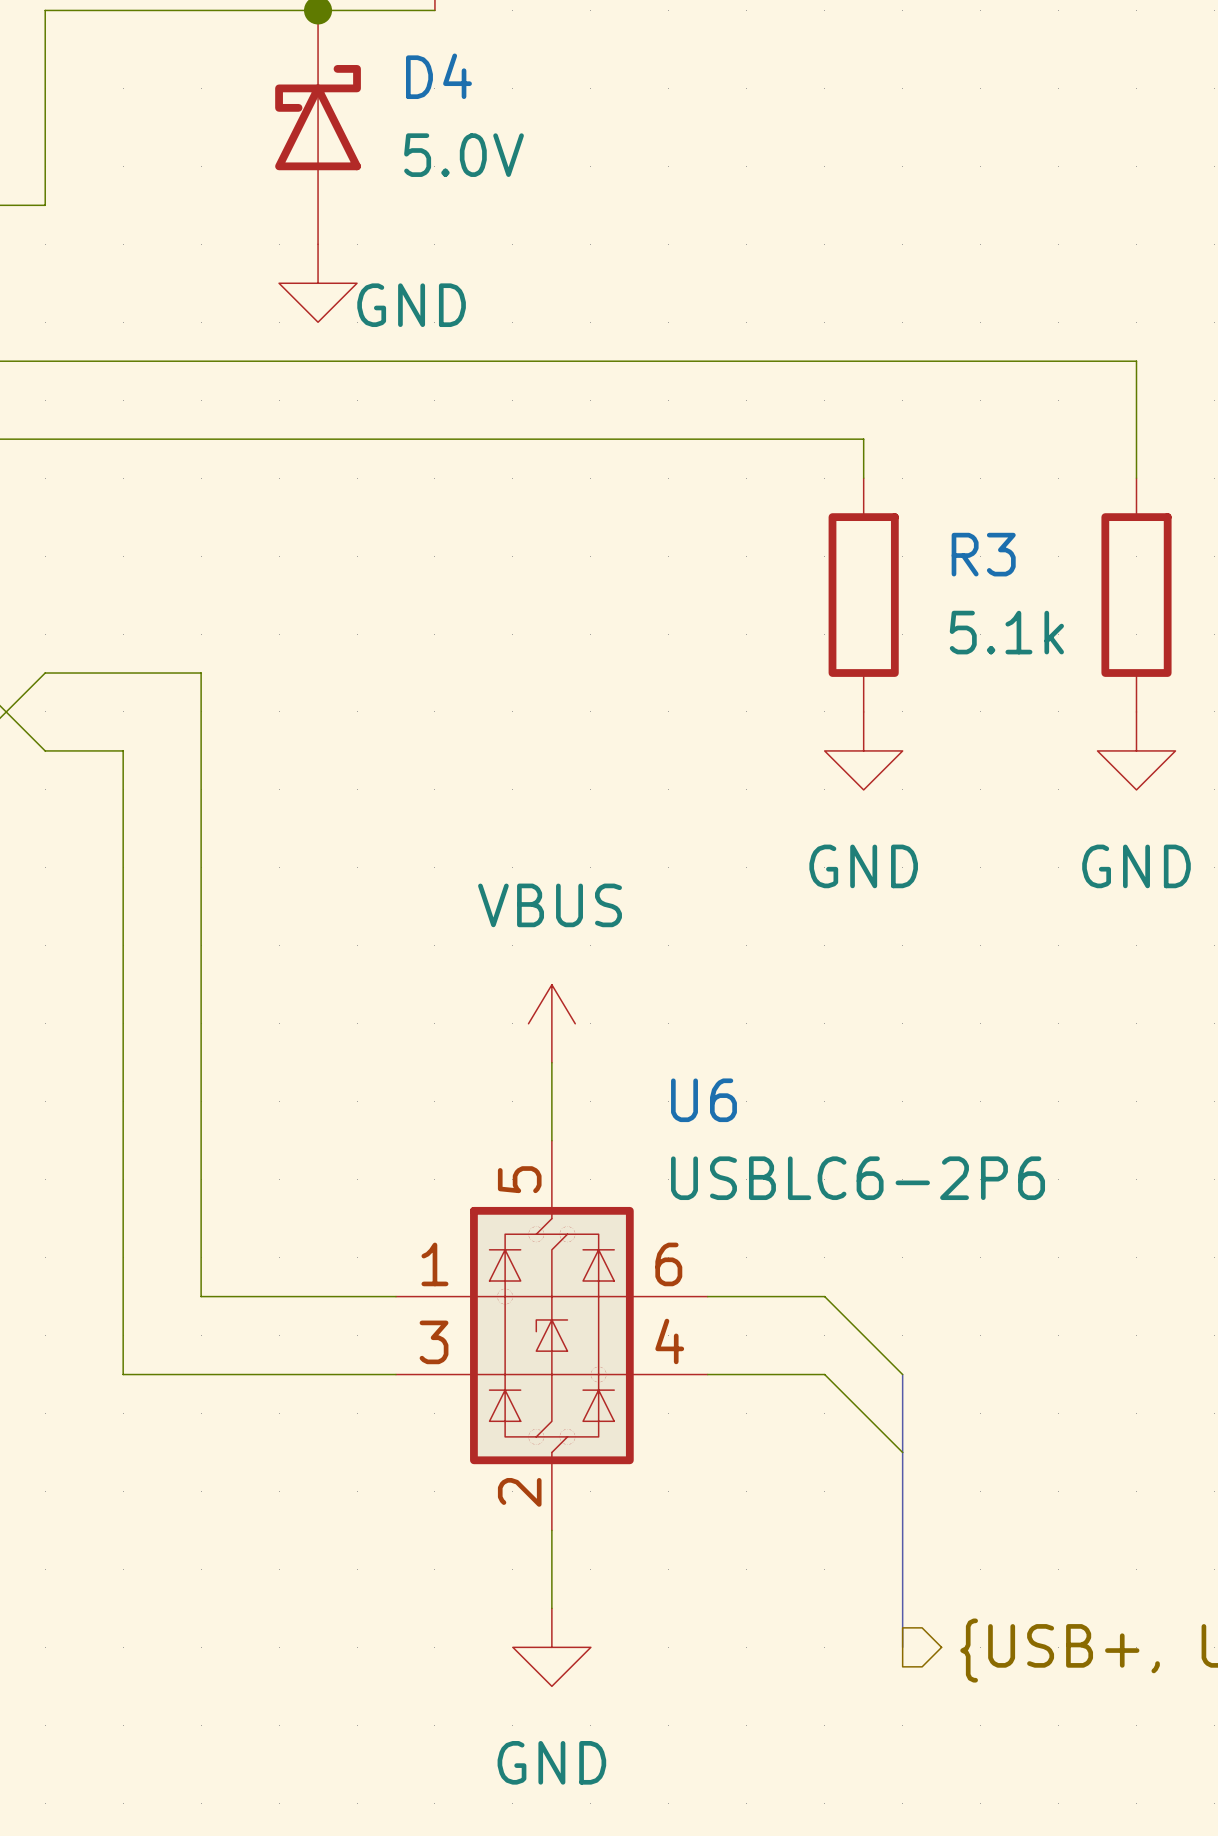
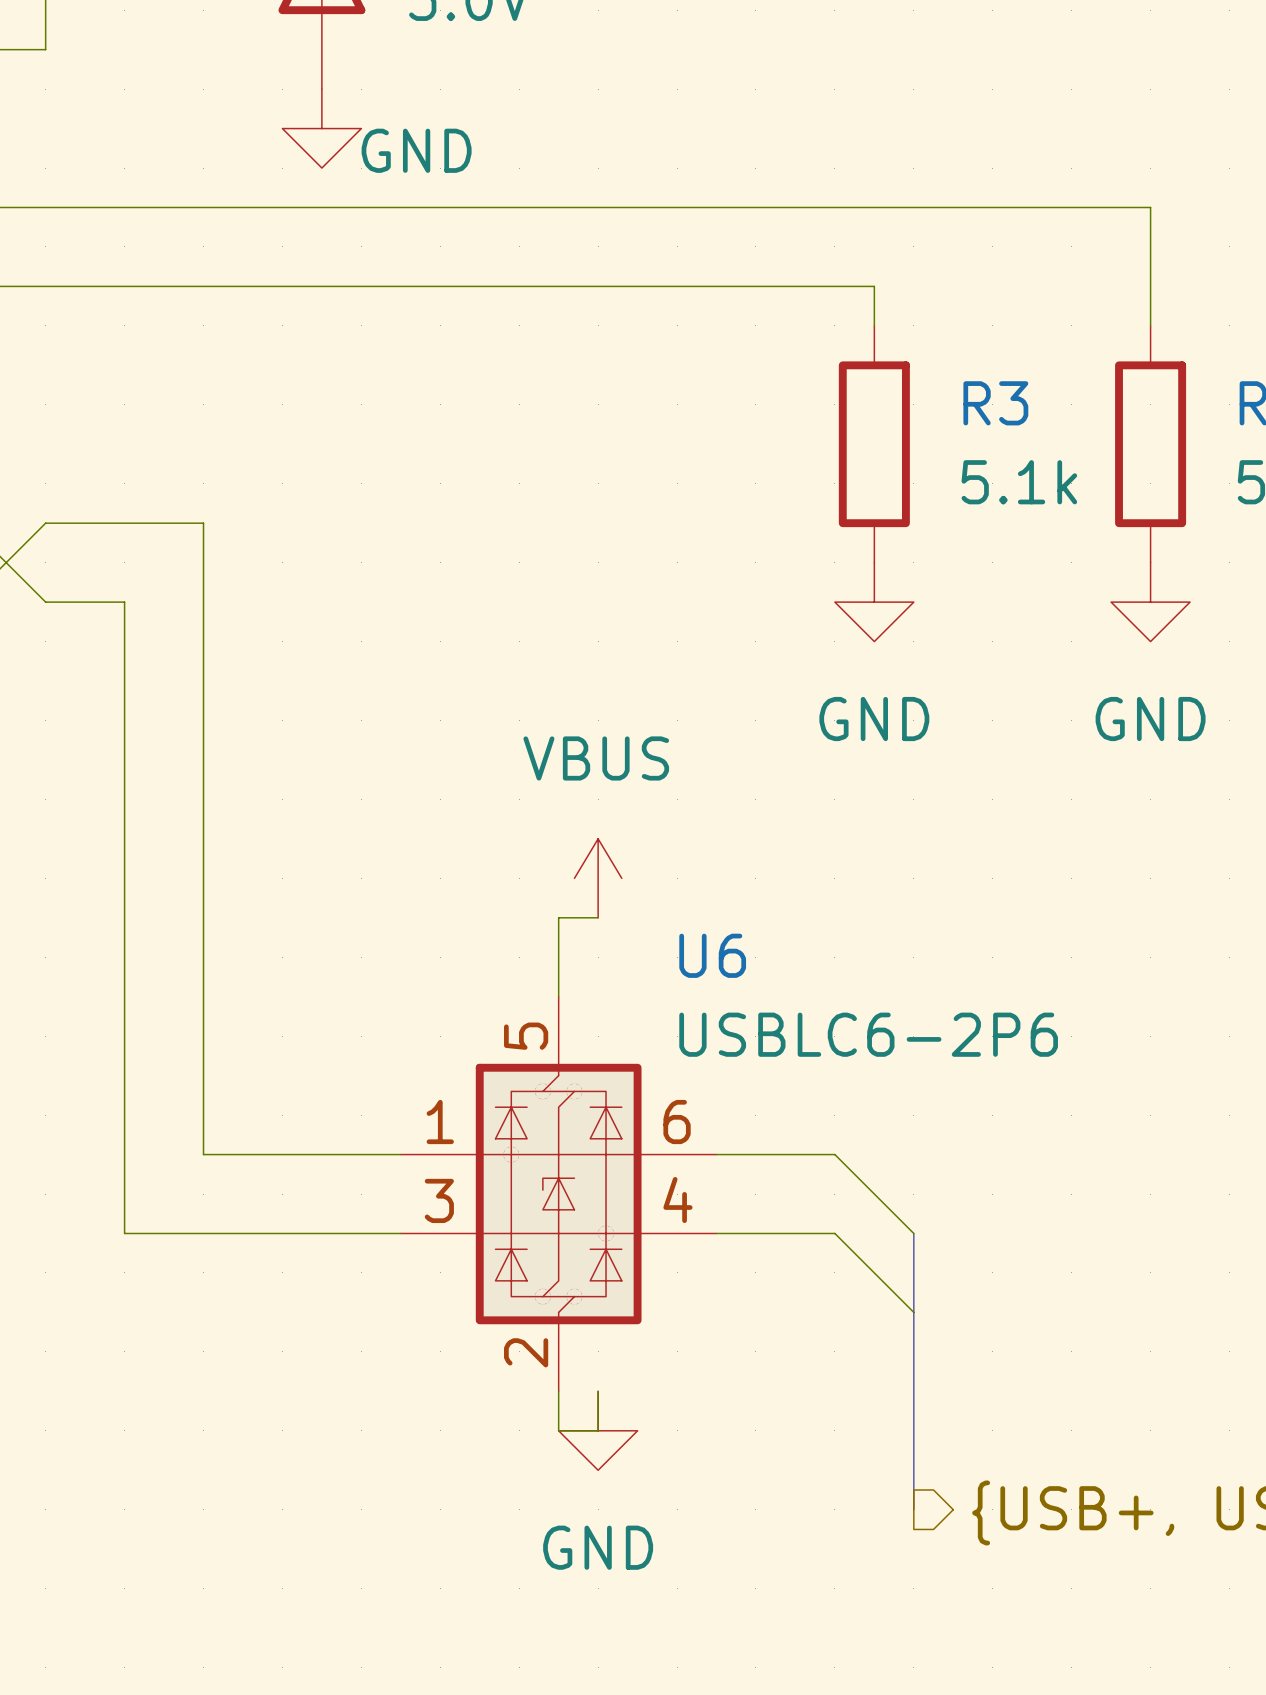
power symbol position: VBUS (551, 1023) -> VBUS (598, 878)
wire: none -> (558, 917) (598, 917)
wire: (551, 1569) (551, 1608) -> (558, 1430) (598, 1430) (598, 1391)
power symbol position: GND (551, 1647) -> GND (598, 1430)

